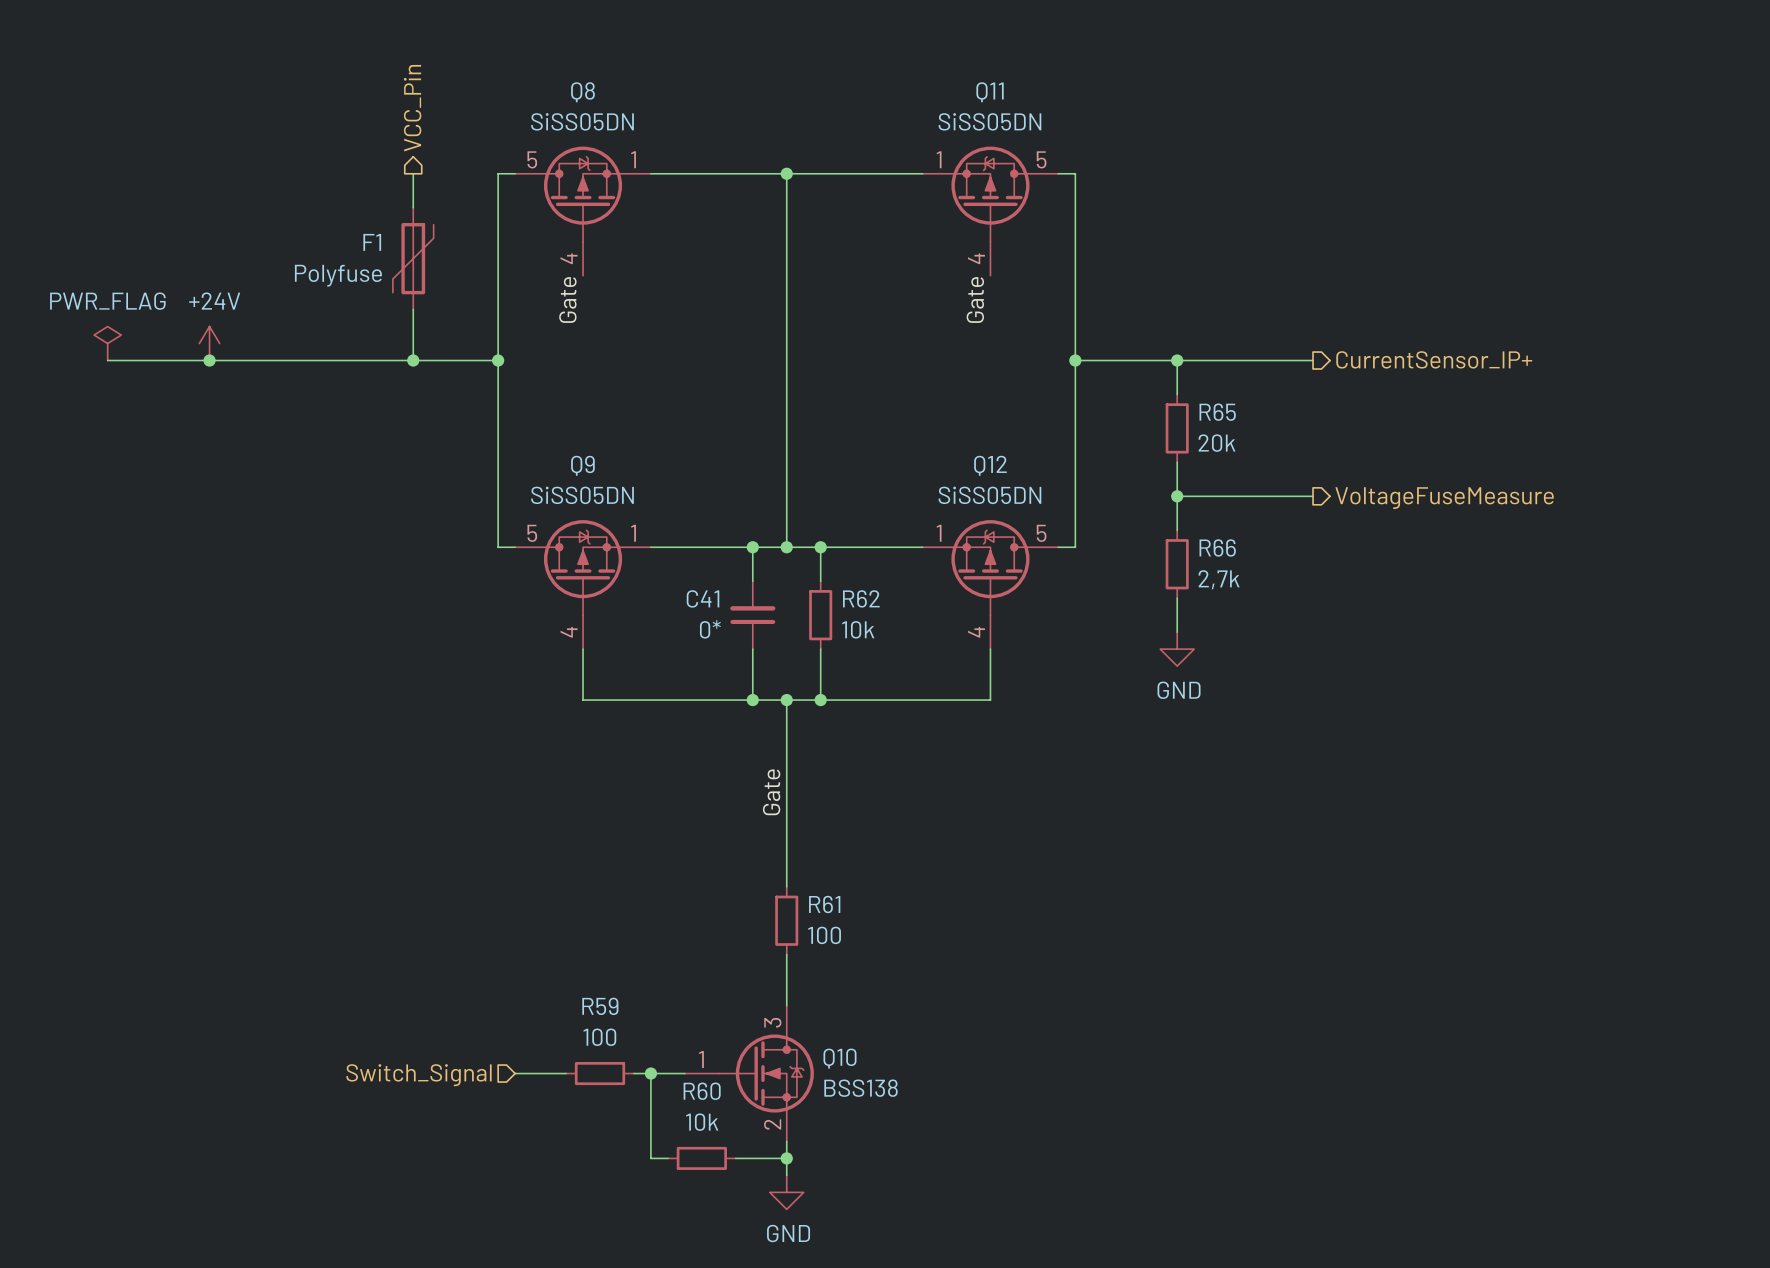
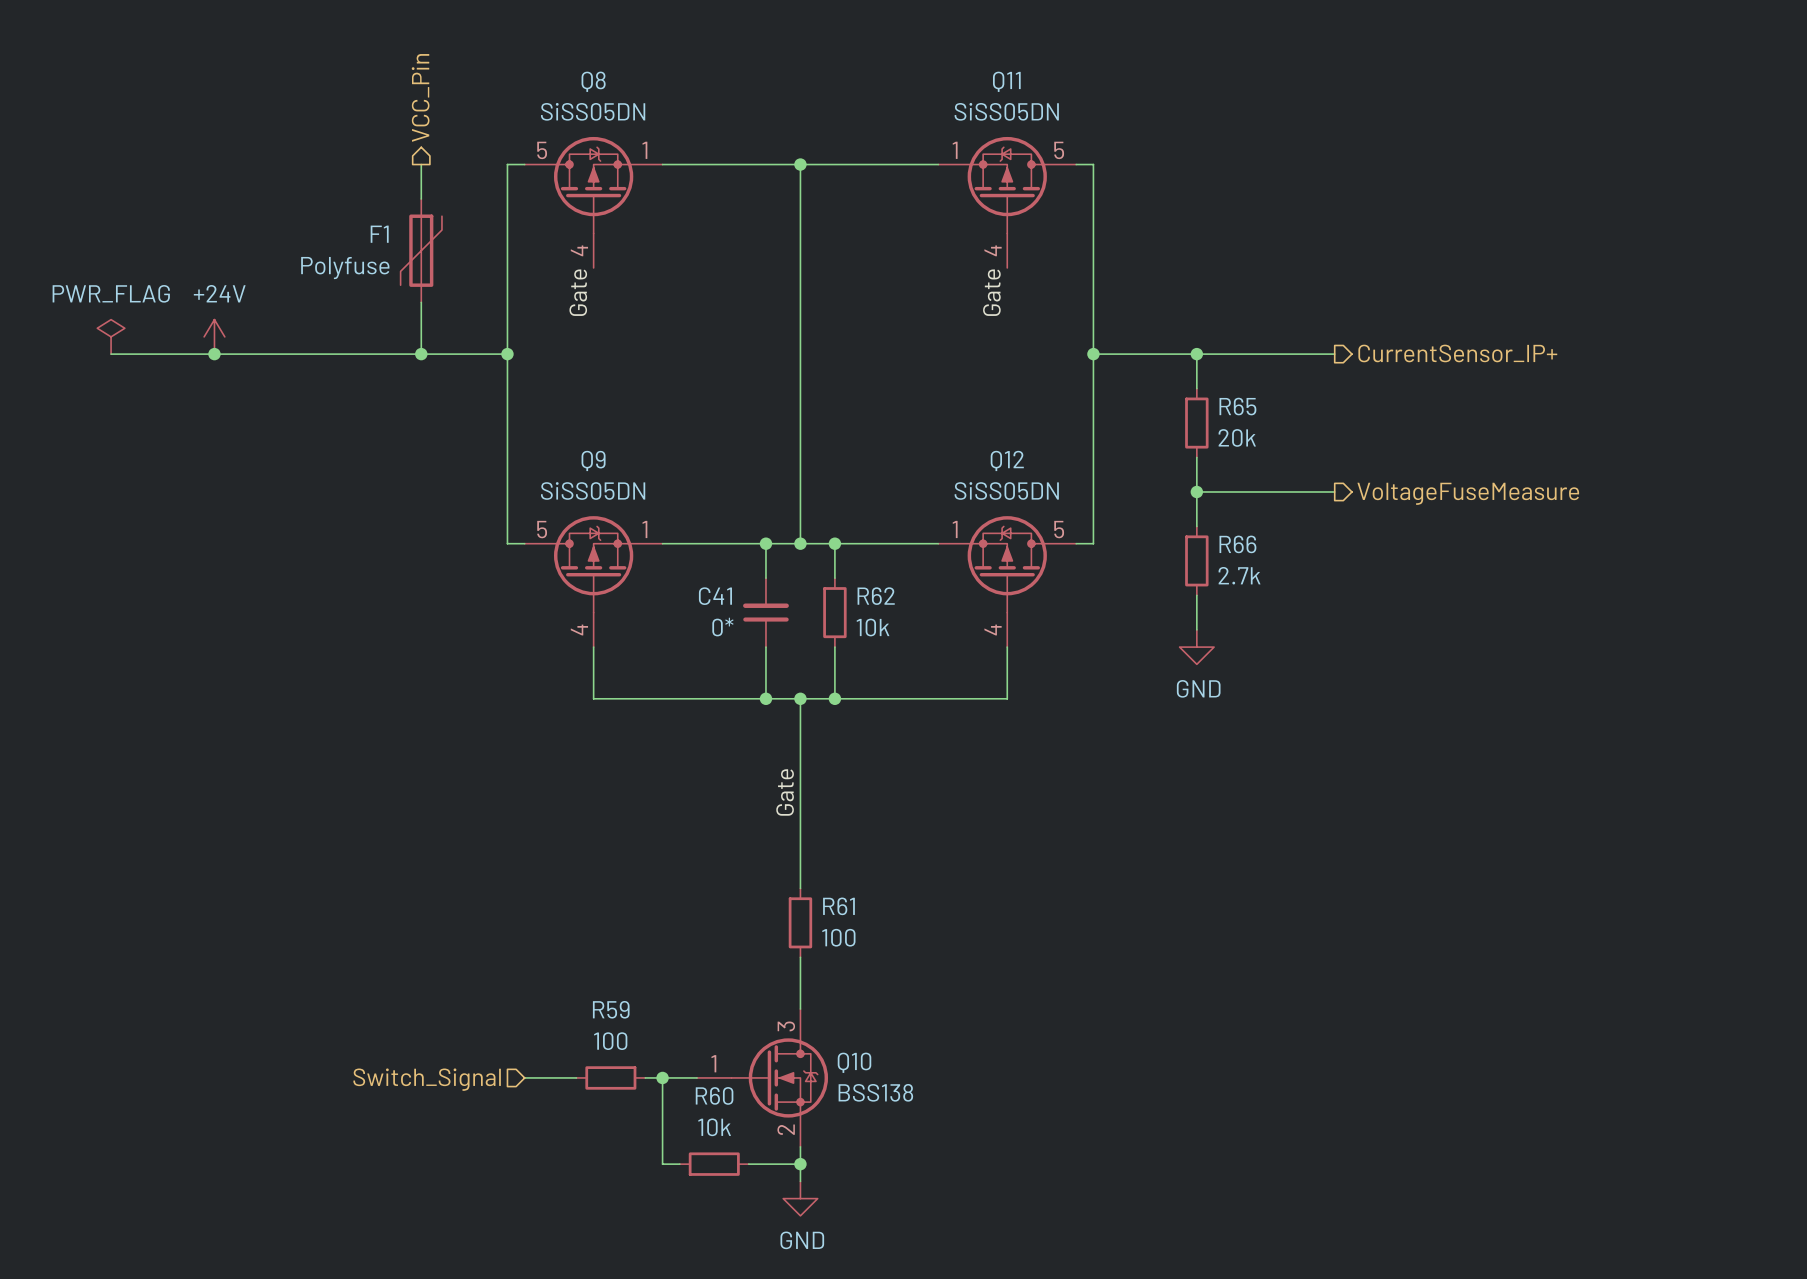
R66 value: 2,7k (1219, 579) -> 2.7k (1239, 575)

